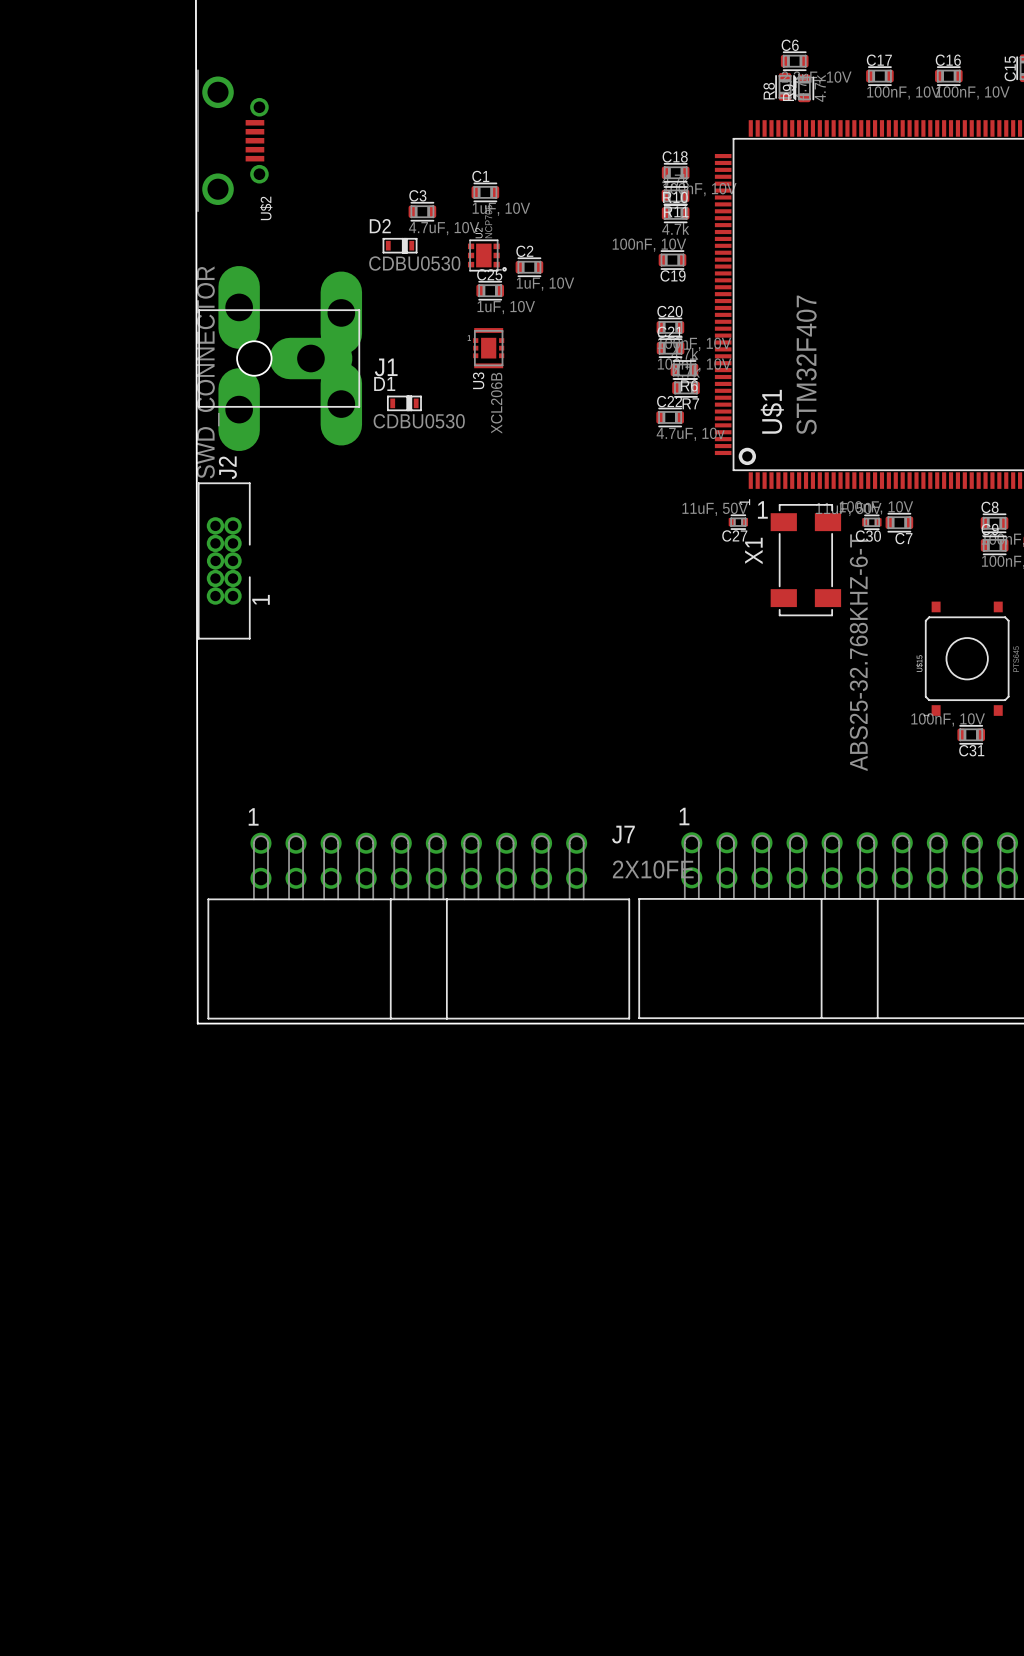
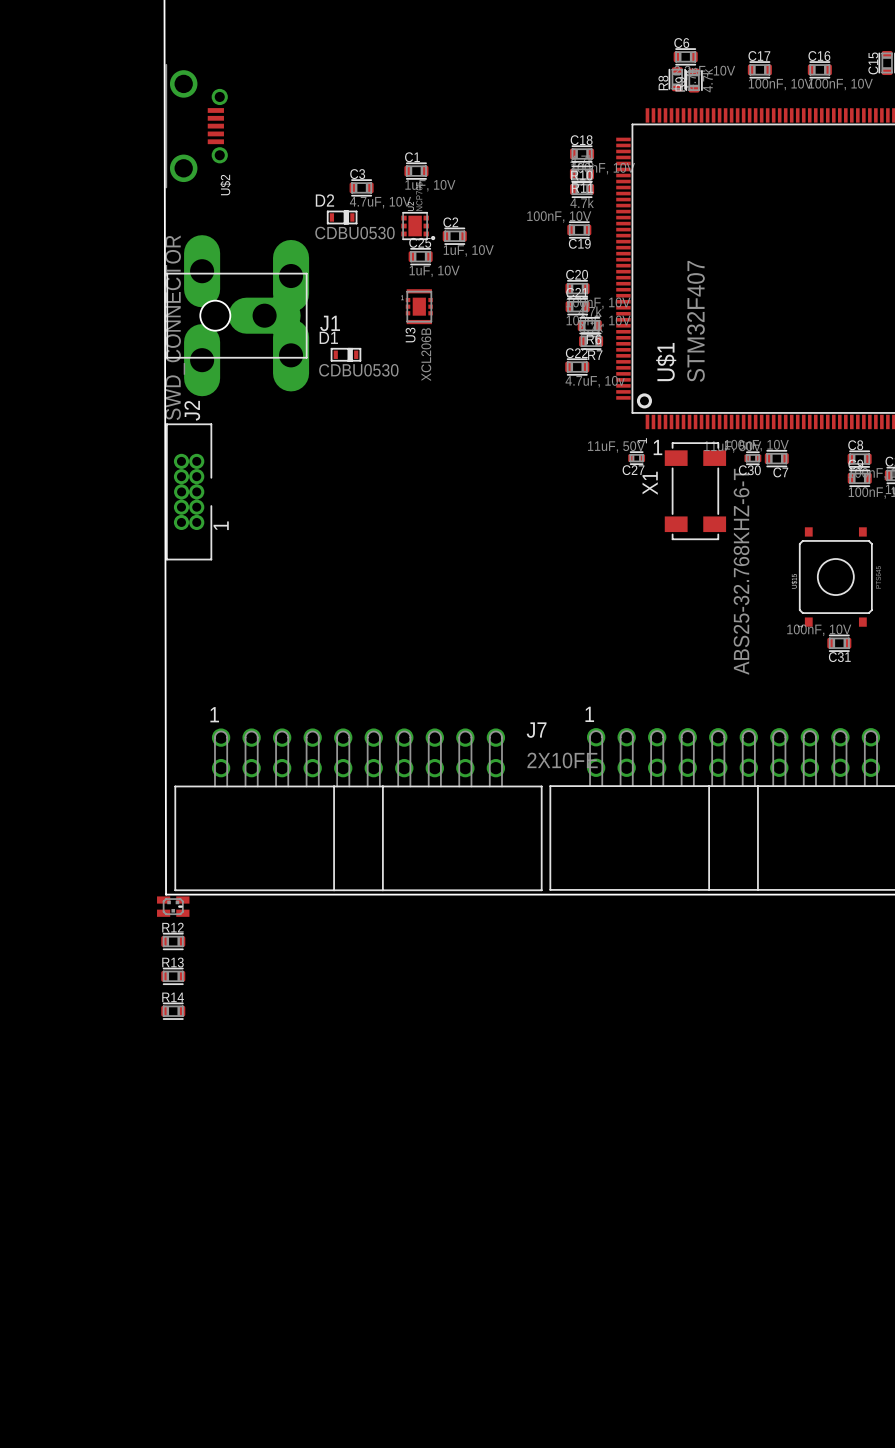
part: none -> (173, 906)
R12: none -> (173, 941)
R13: none -> (173, 976)
R14: none -> (173, 1011)

